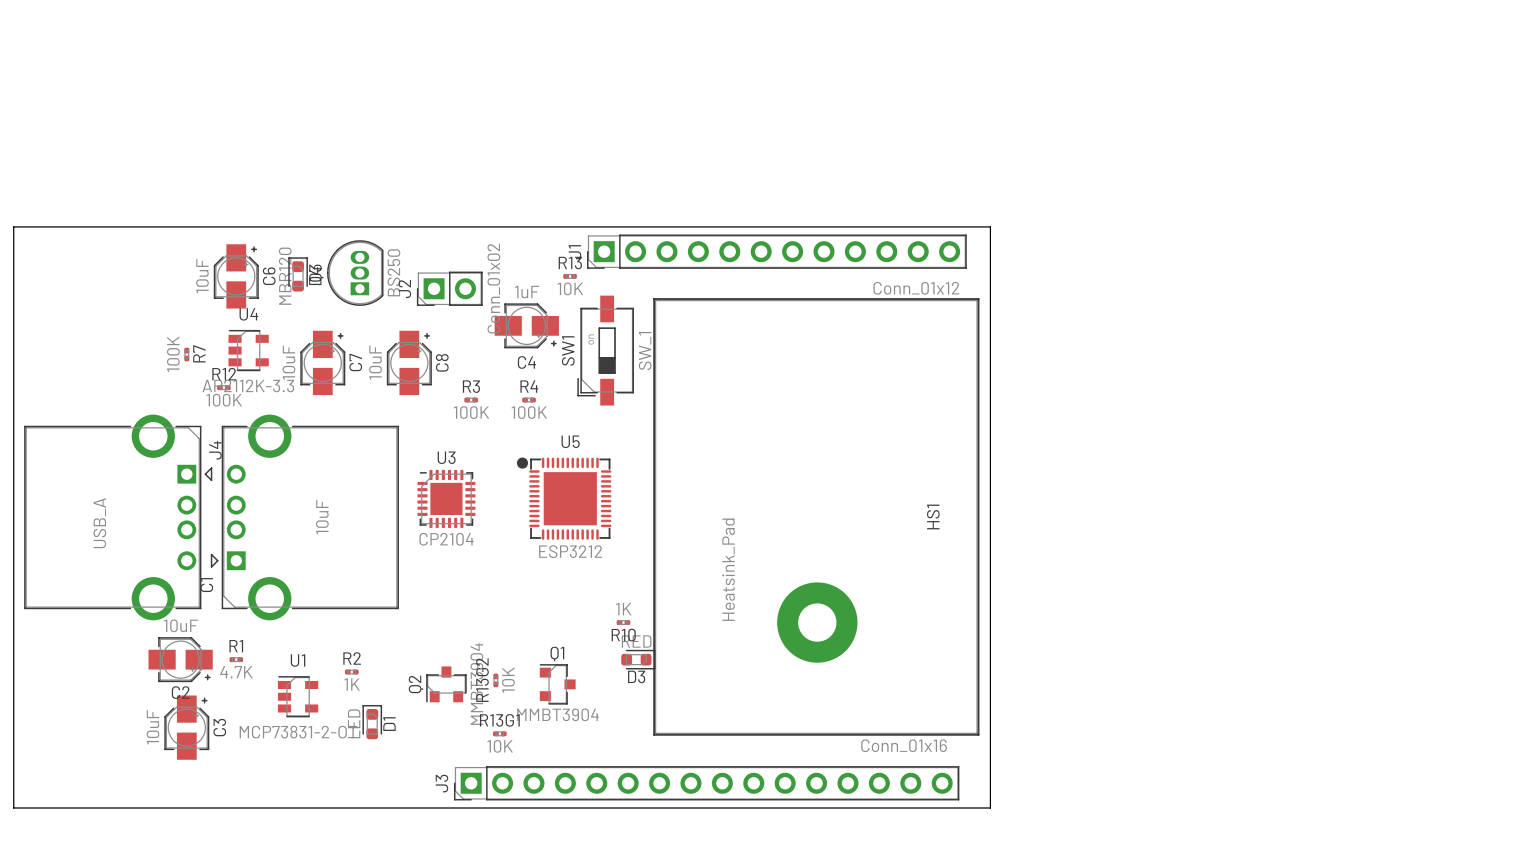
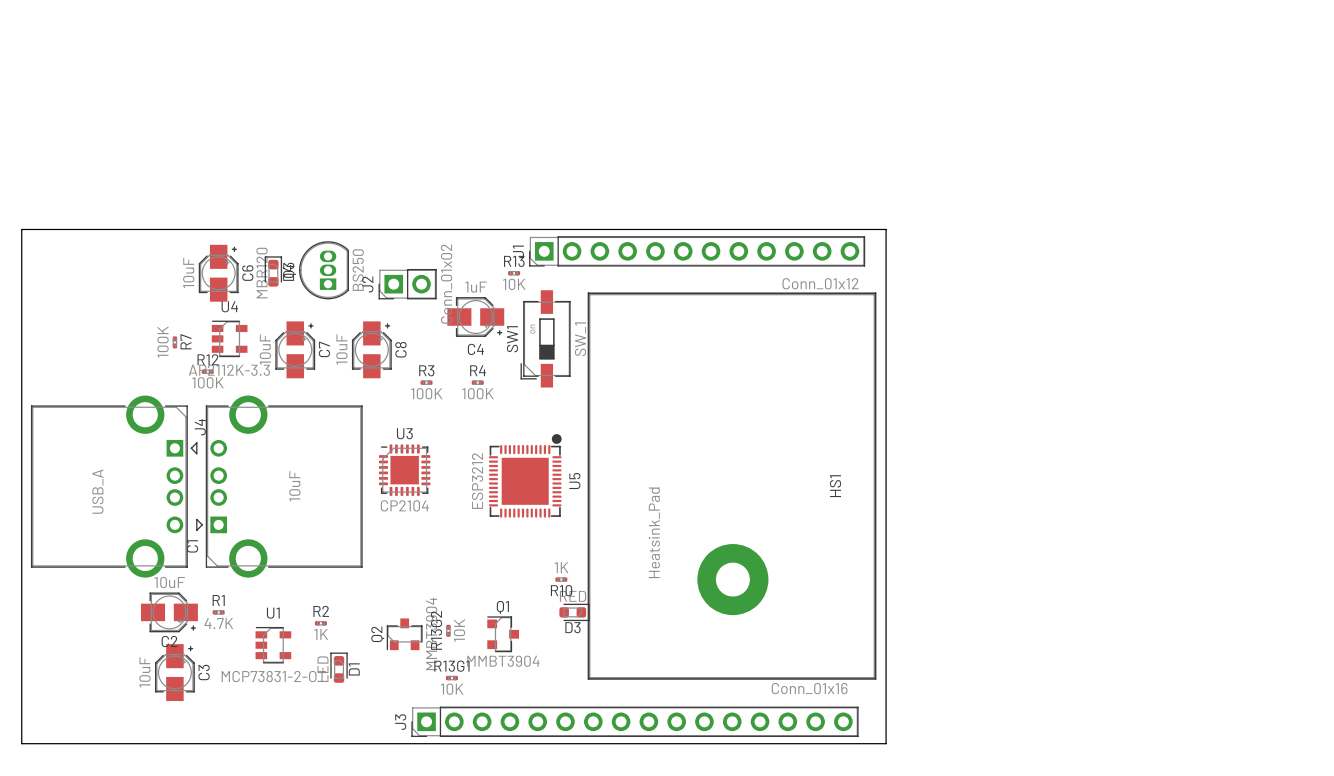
U5 rotation: 0° (564, 498) -> 90° clockwise (525, 475)

